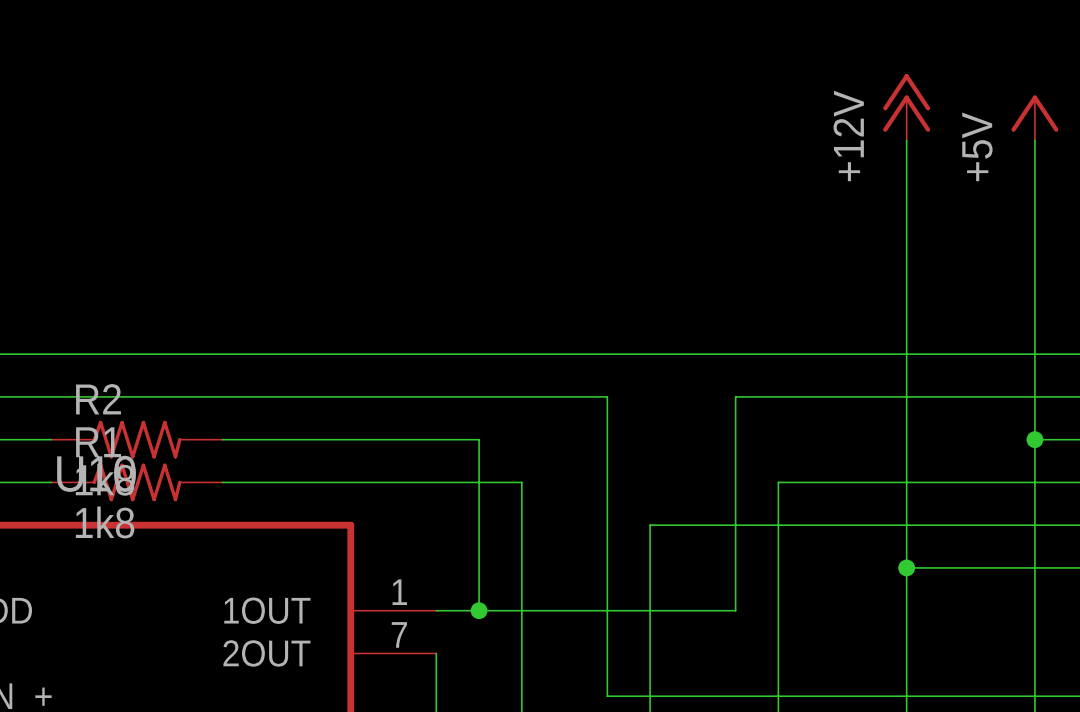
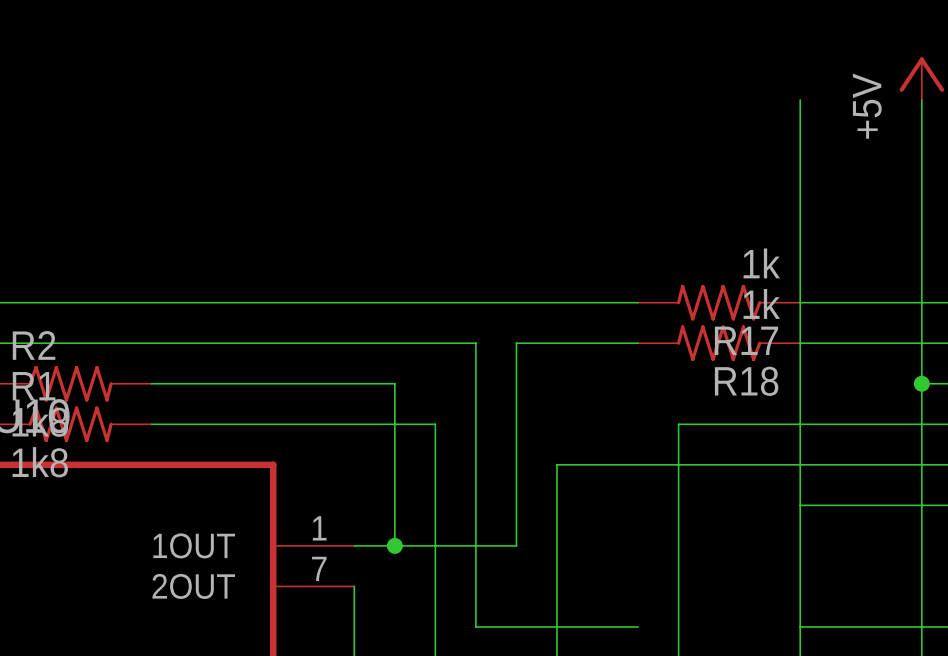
power symbol: +12V (906, 107) -> none
R17: none -> 1k (719, 302)
wire: (564, 396) (607, 396) -> (638, 343) (516, 343)
R18: none -> 1k (719, 343)
wire: (906, 396) (735, 396) (735, 610) (607, 610) (607, 696) -> (475, 343) (475, 626) (516, 626)
junction: (906, 567) -> none
wire: (735, 696) (906, 696) -> none

